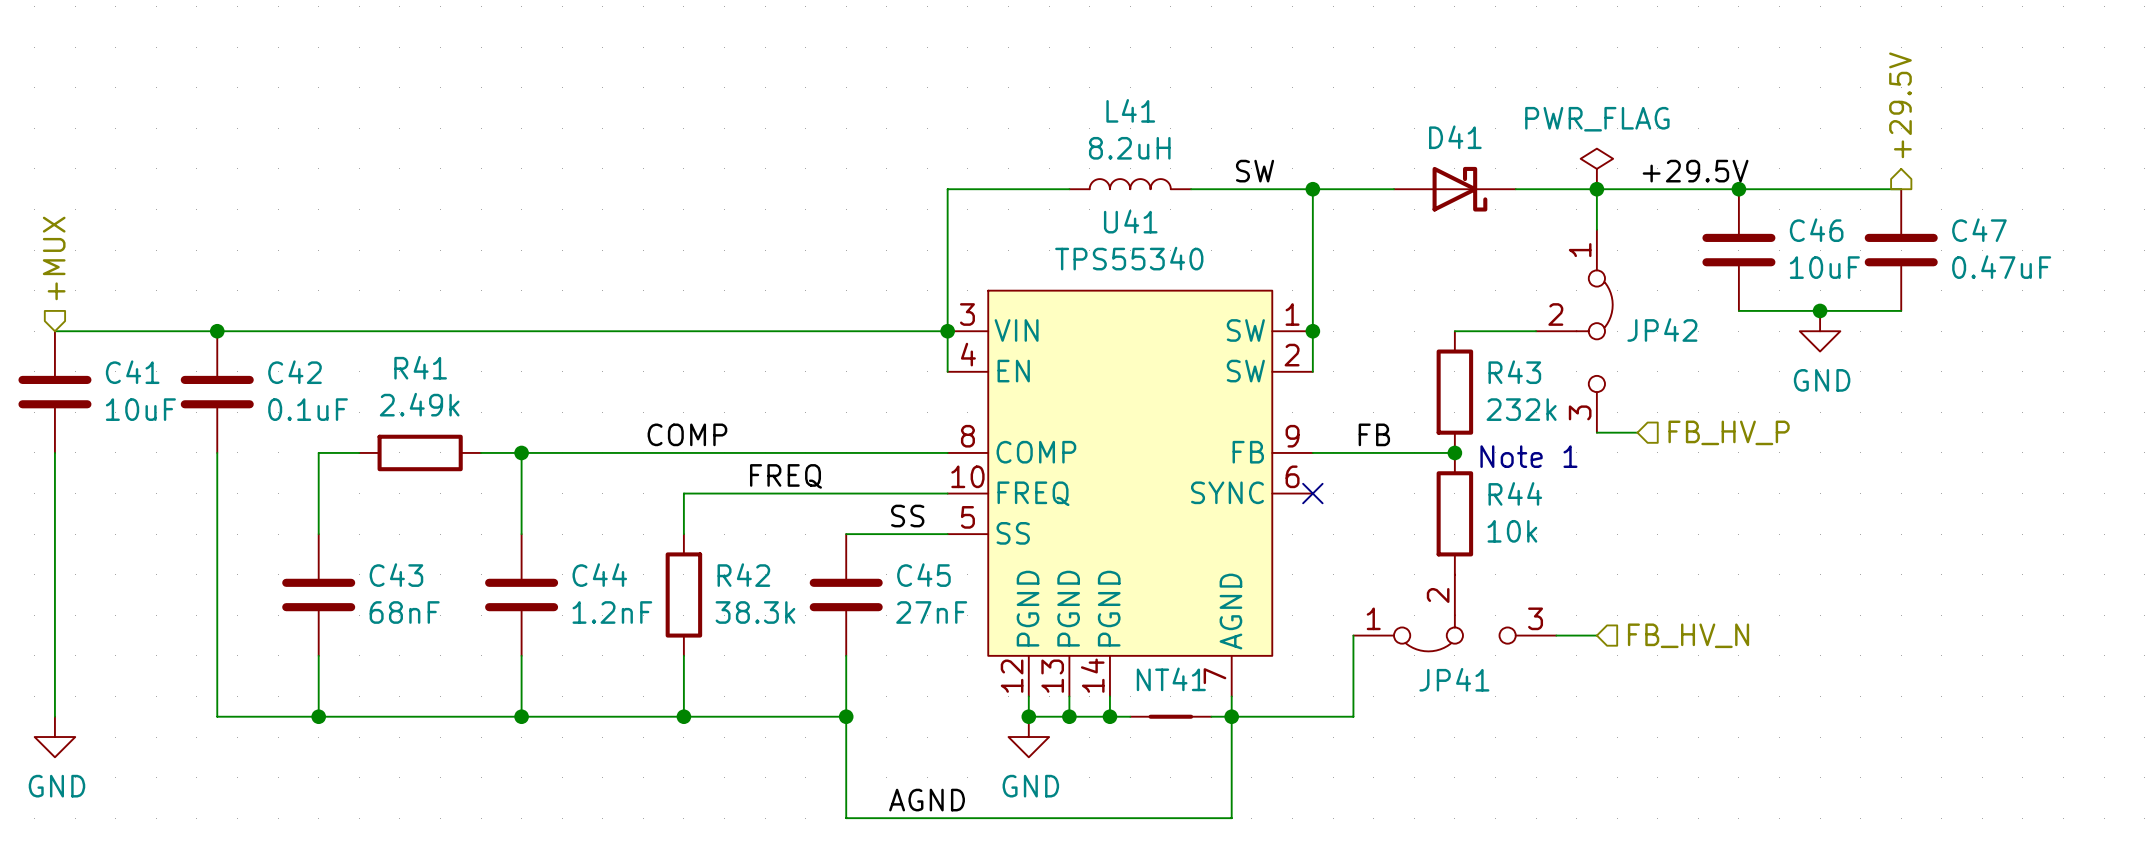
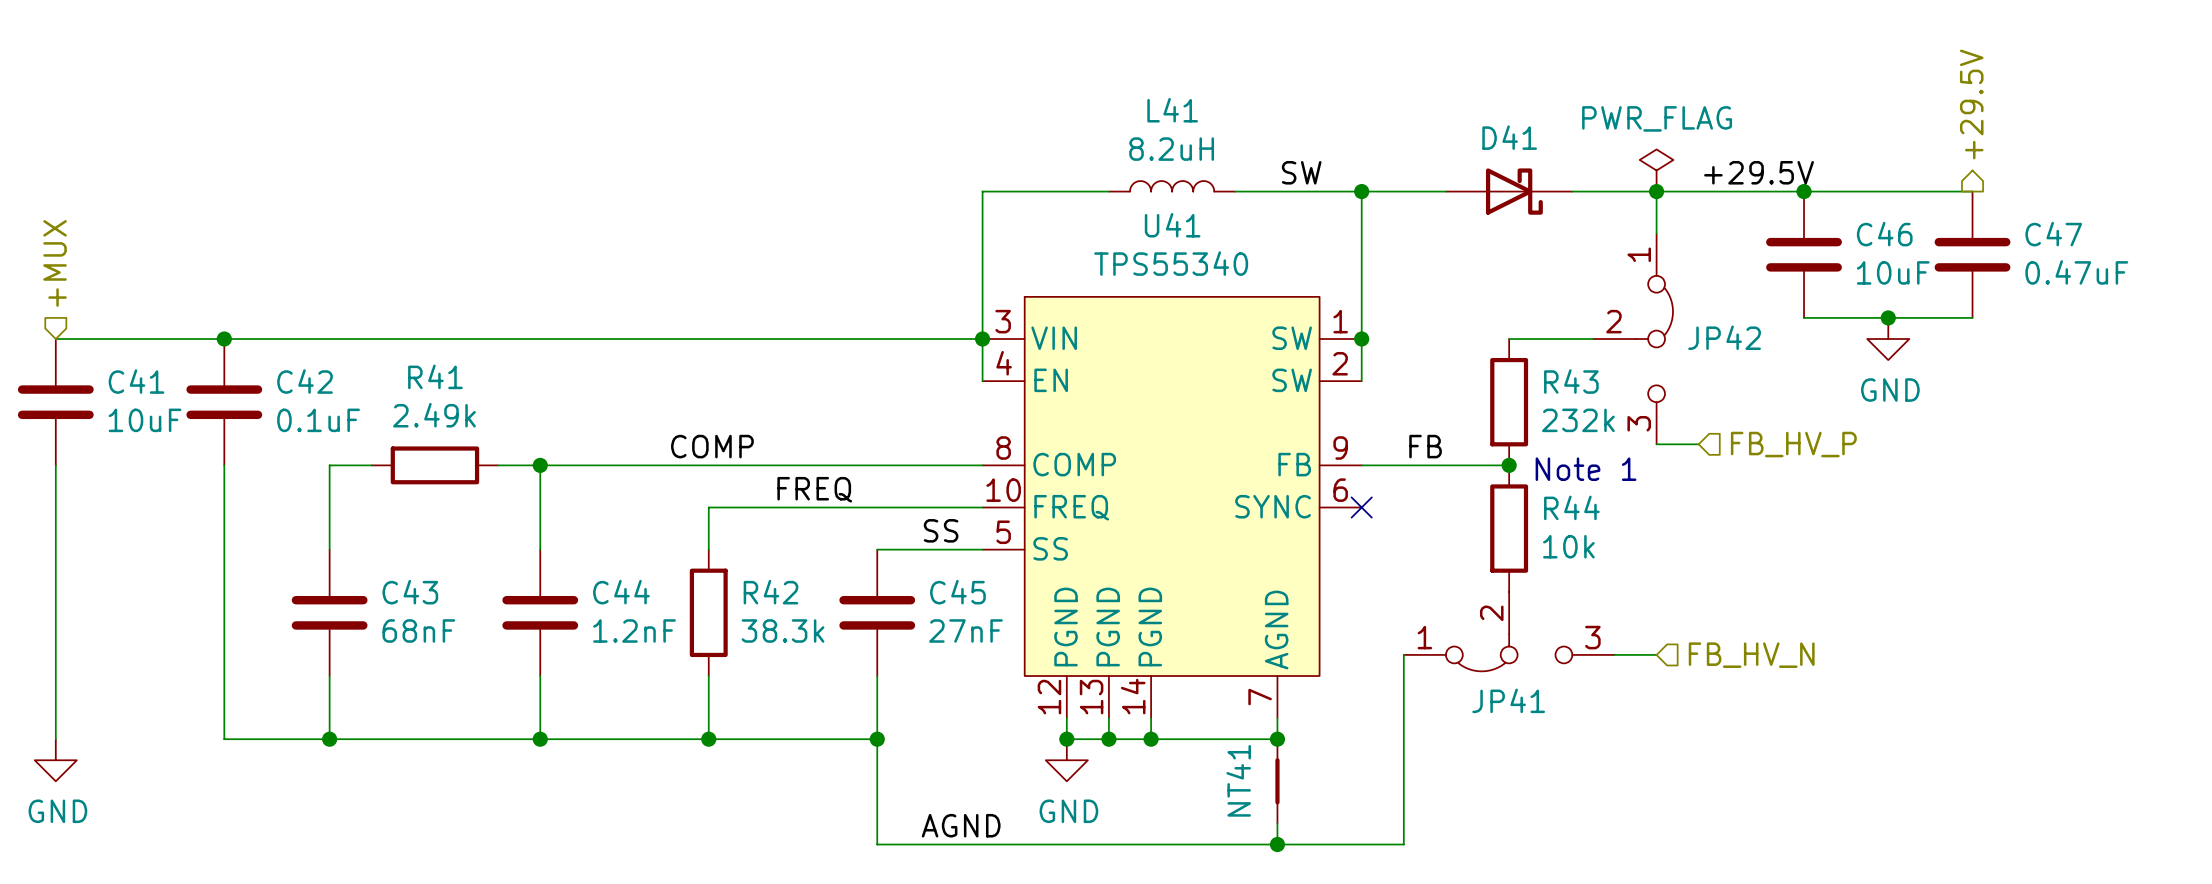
NT41 name position: NT41 (1171, 679) -> NT41 (1238, 780)
NT41 rotation: 0° (1170, 716) -> 90° clockwise (1277, 781)
NT41 position: (1170, 716) -> (1277, 781)
wire: (1353, 716) (1231, 716) (1231, 797) -> (1403, 739) (1403, 844) (1277, 844)
junction: none -> (1277, 844)

